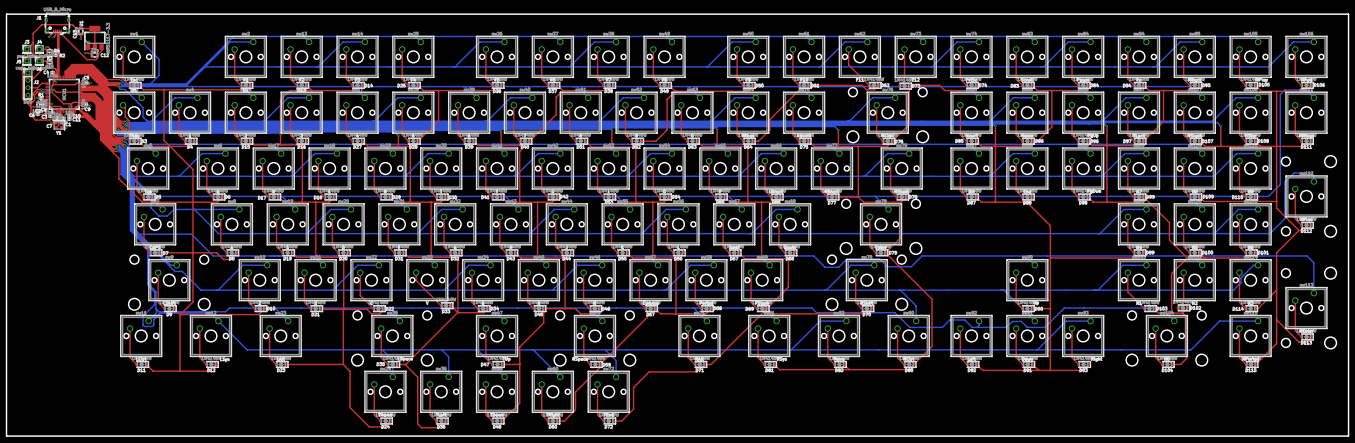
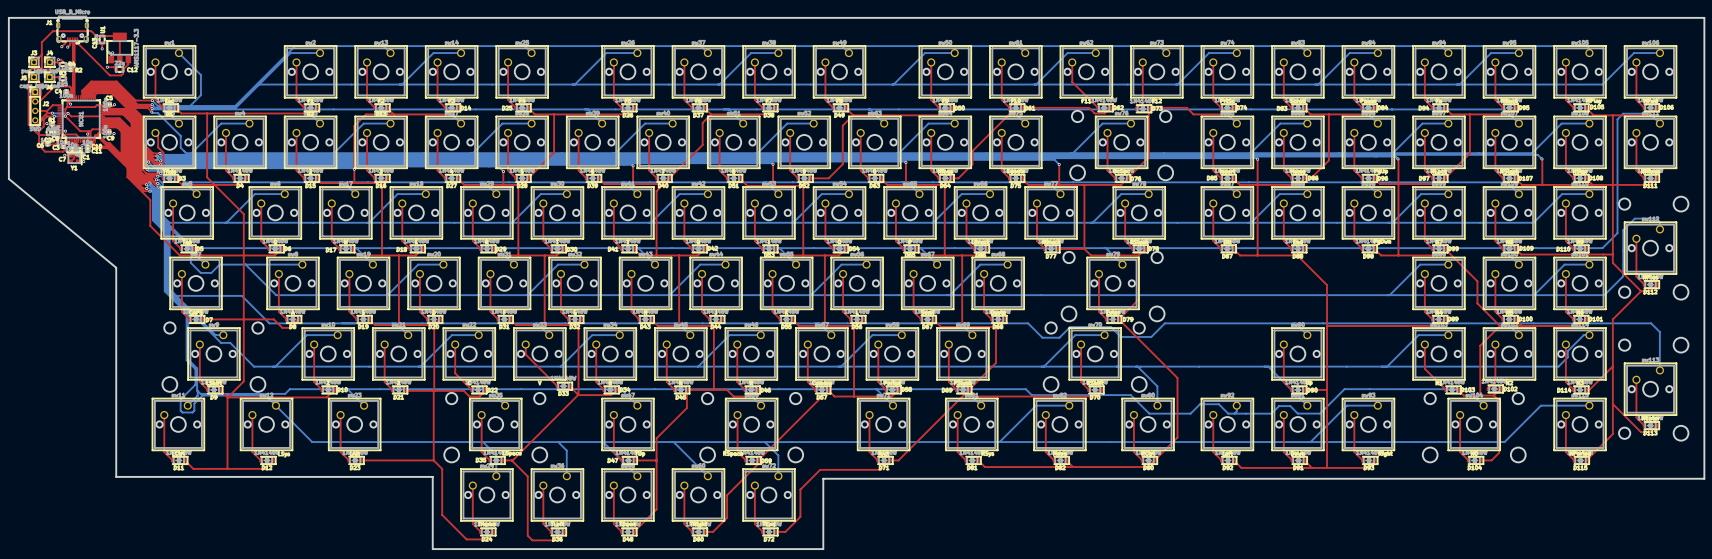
board edge: (7, 14) (6, 436) (1348, 436) (1348, 14) -> (8, 17) (8, 178) (116, 267) (116, 476) (432, 476) (432, 549) (823, 549) (823, 478) (1704, 478) (1703, 17)

